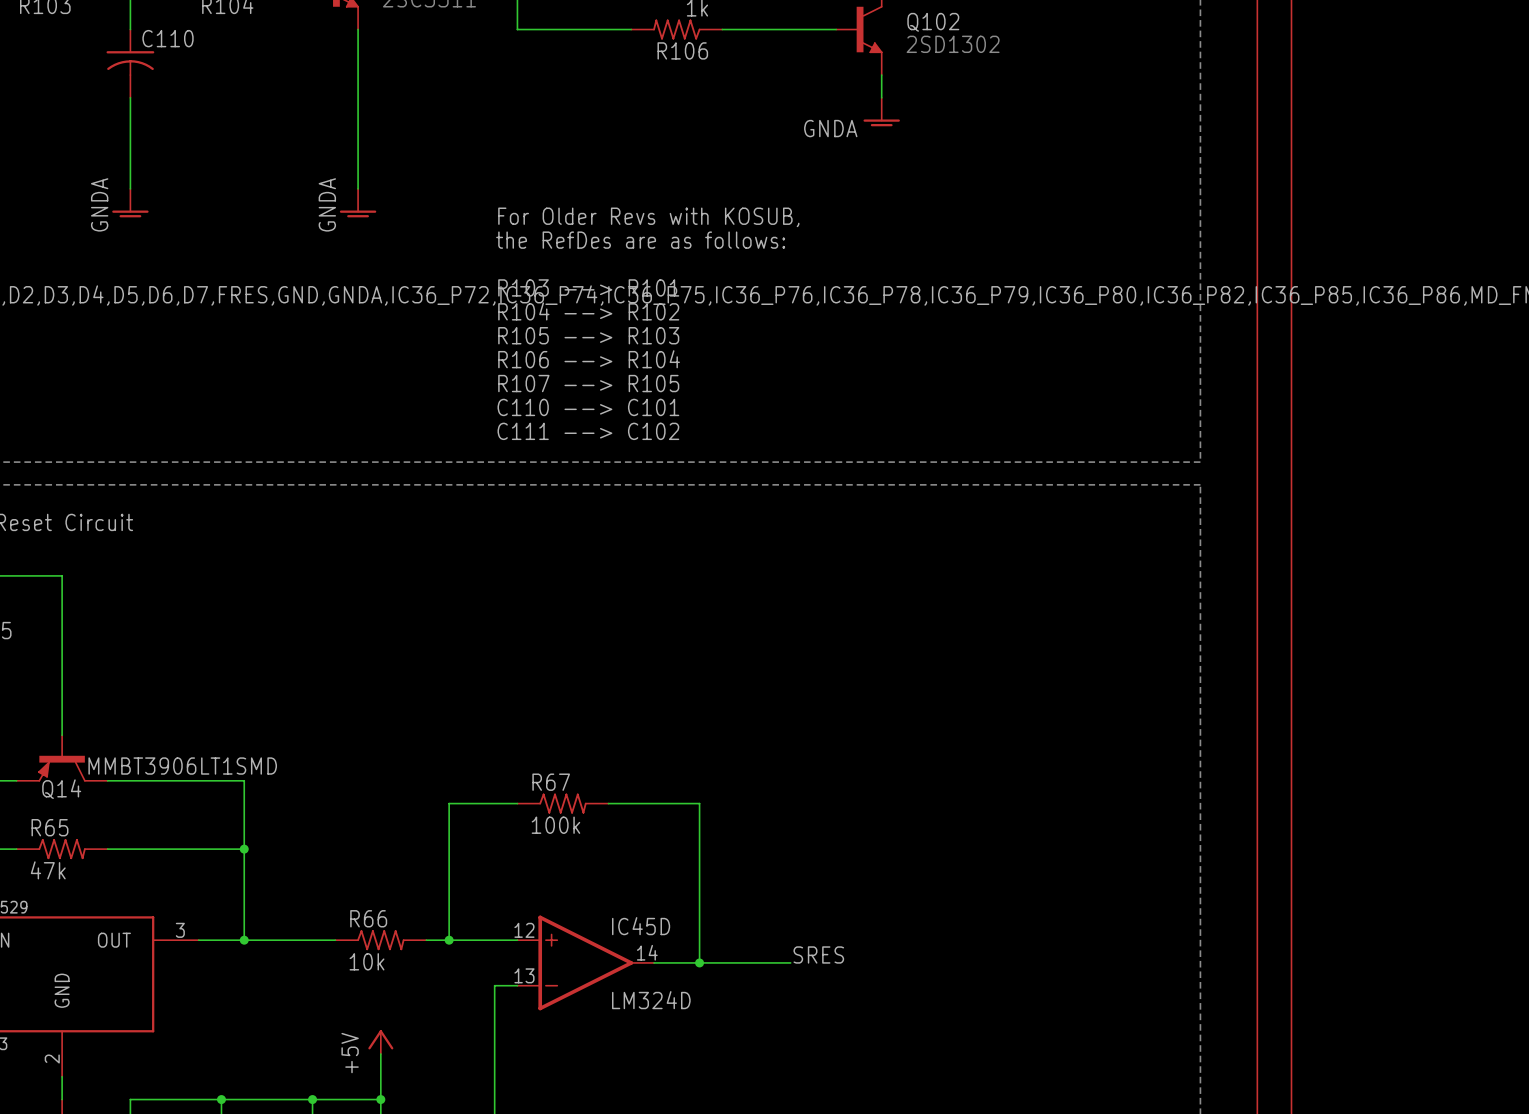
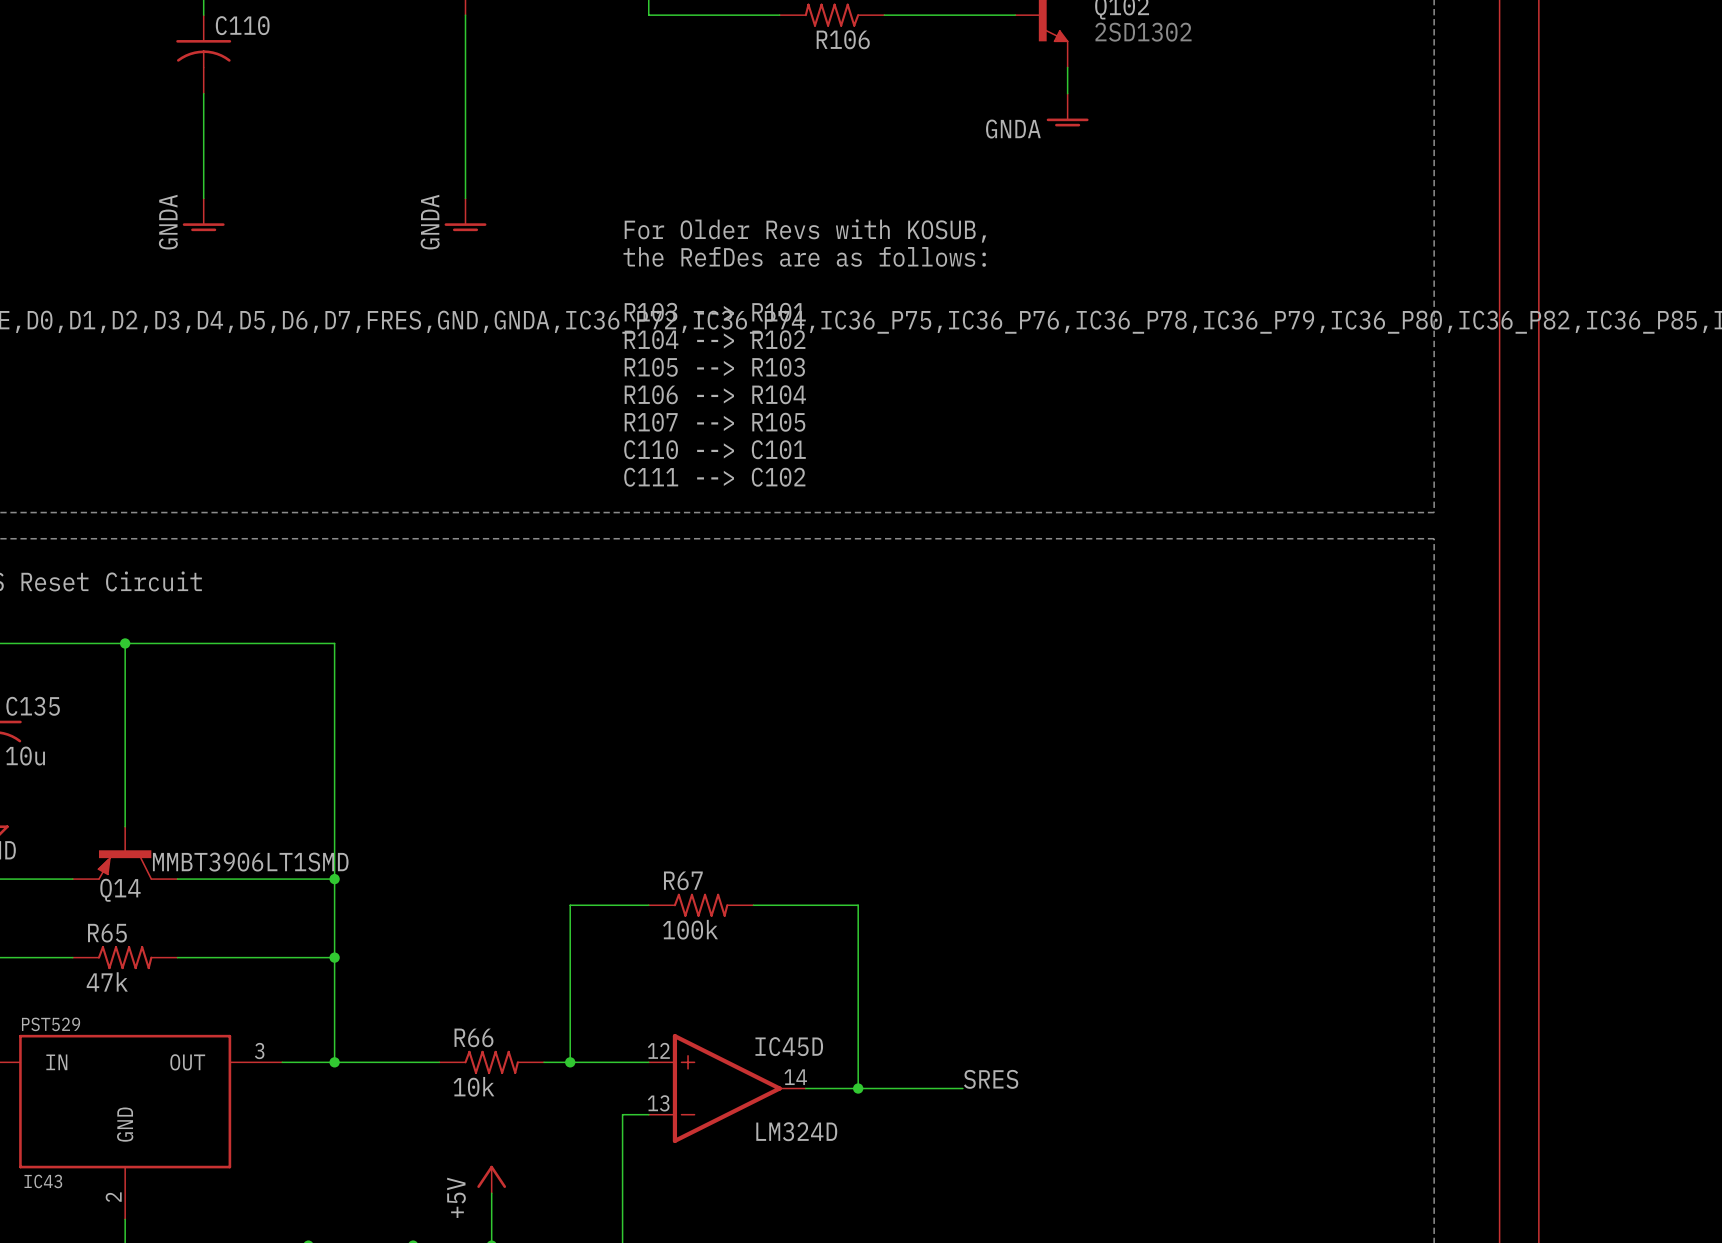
wire: none -> (125, 643) (334, 643) (334, 879)
junction: none -> (125, 643)
junction: none -> (334, 879)

